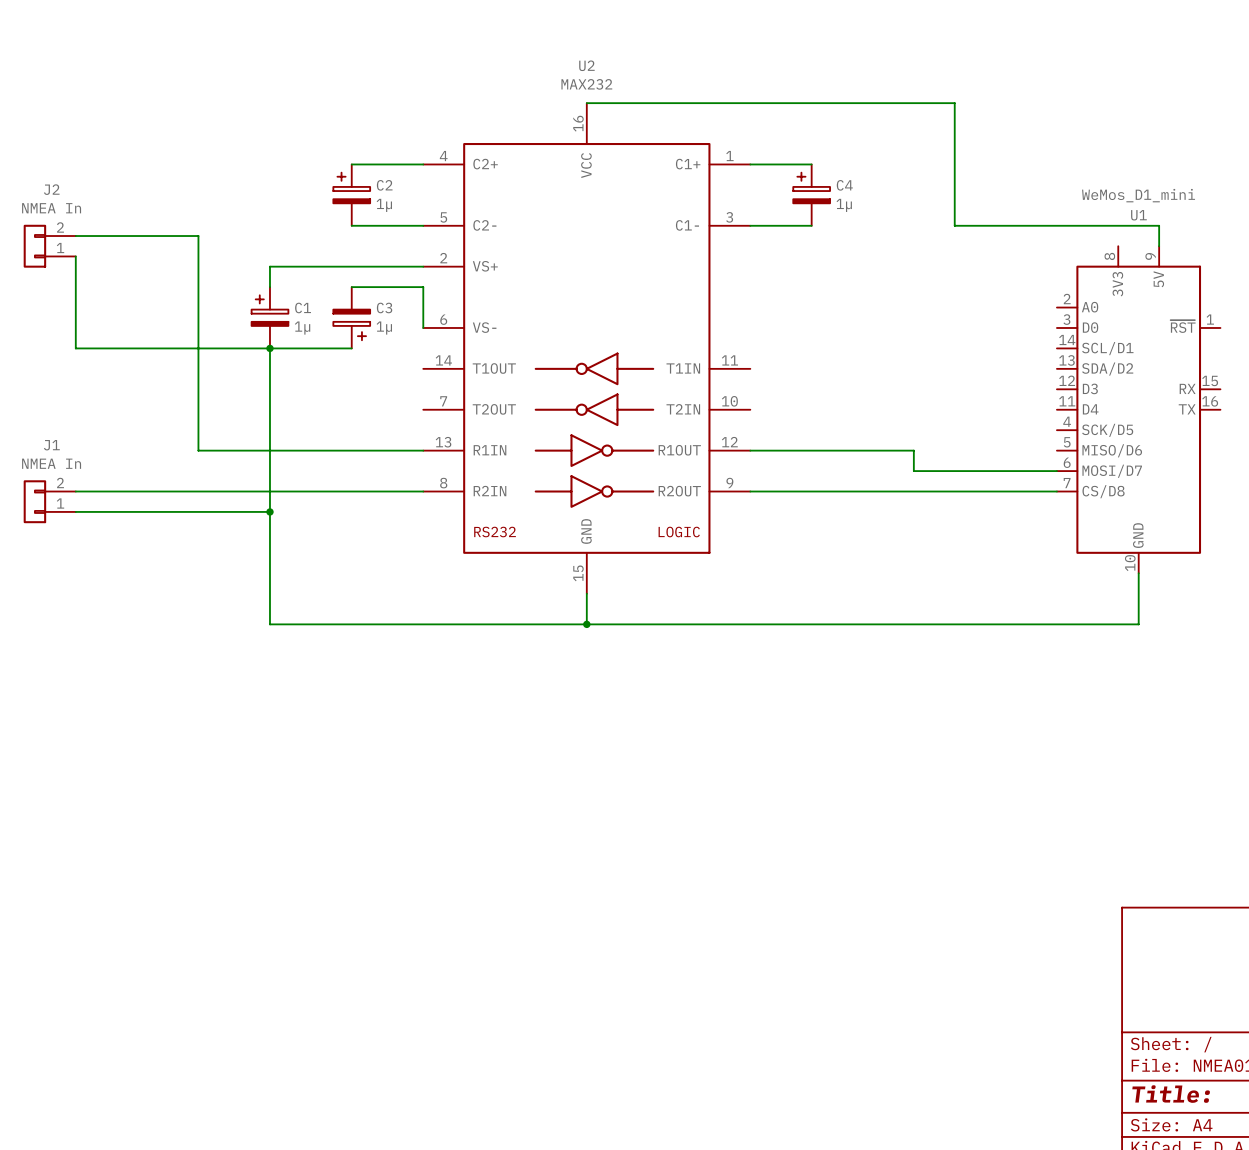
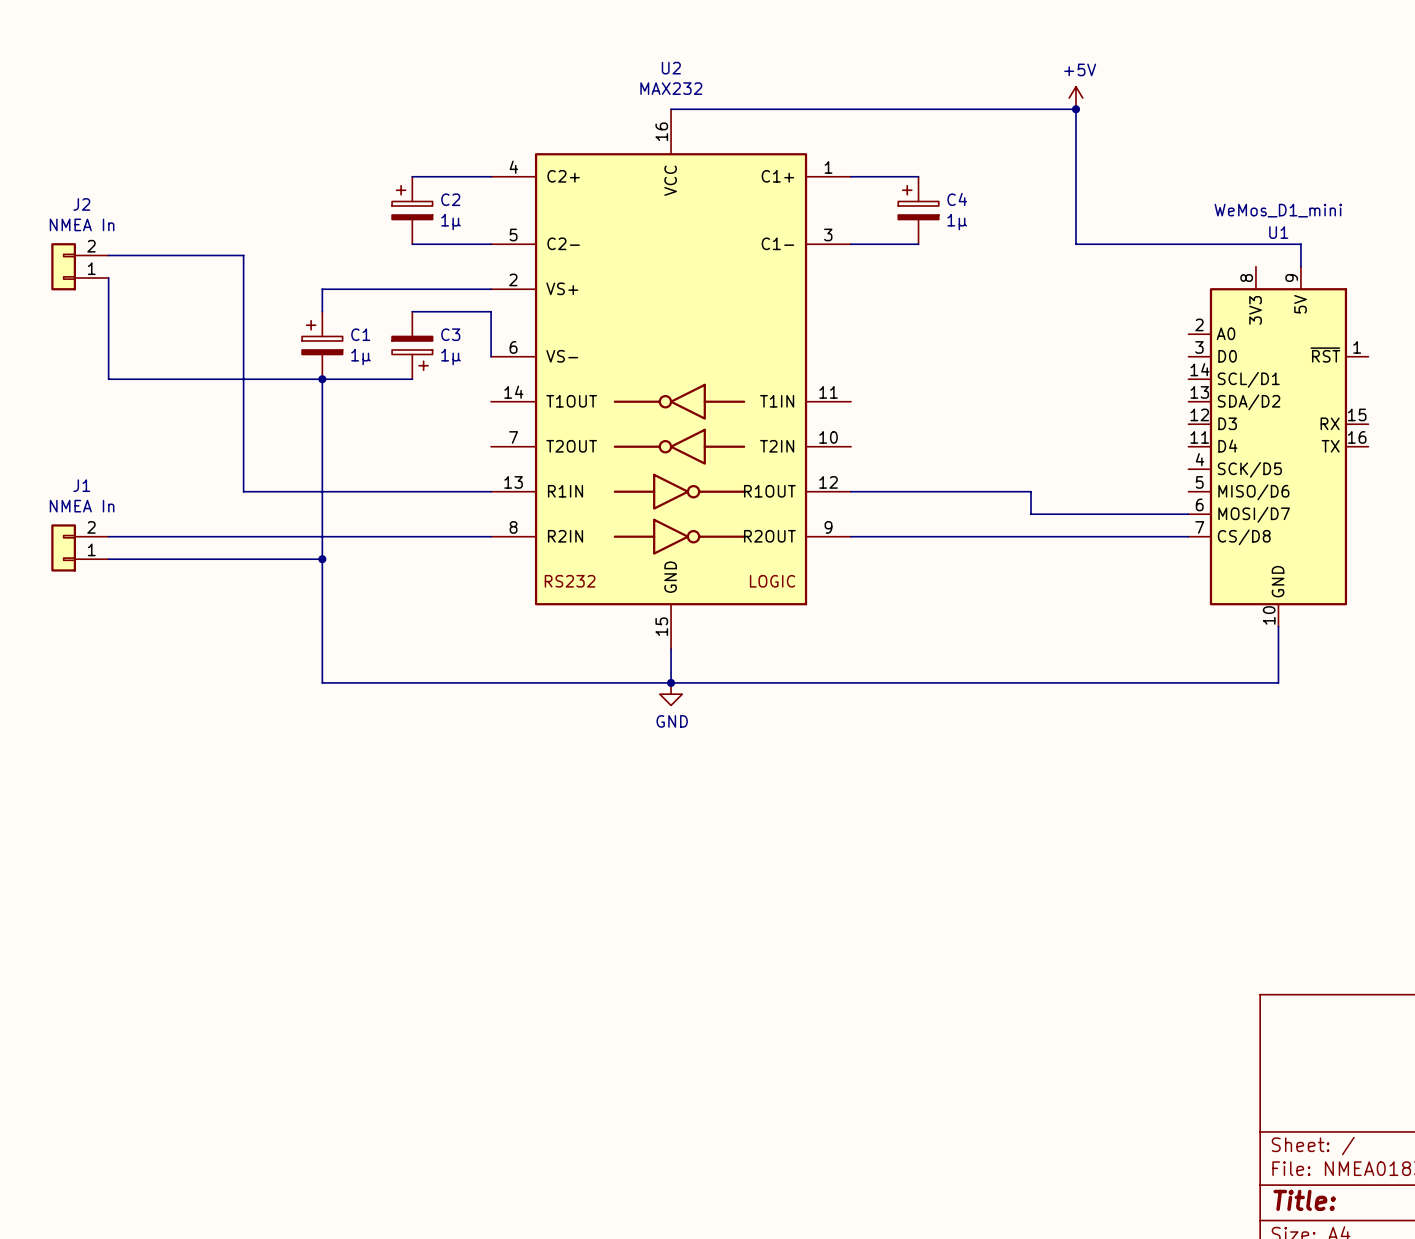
power symbol: none -> +5V (1075, 98)
junction: none -> (1075, 109)
power symbol: none -> GND (671, 694)

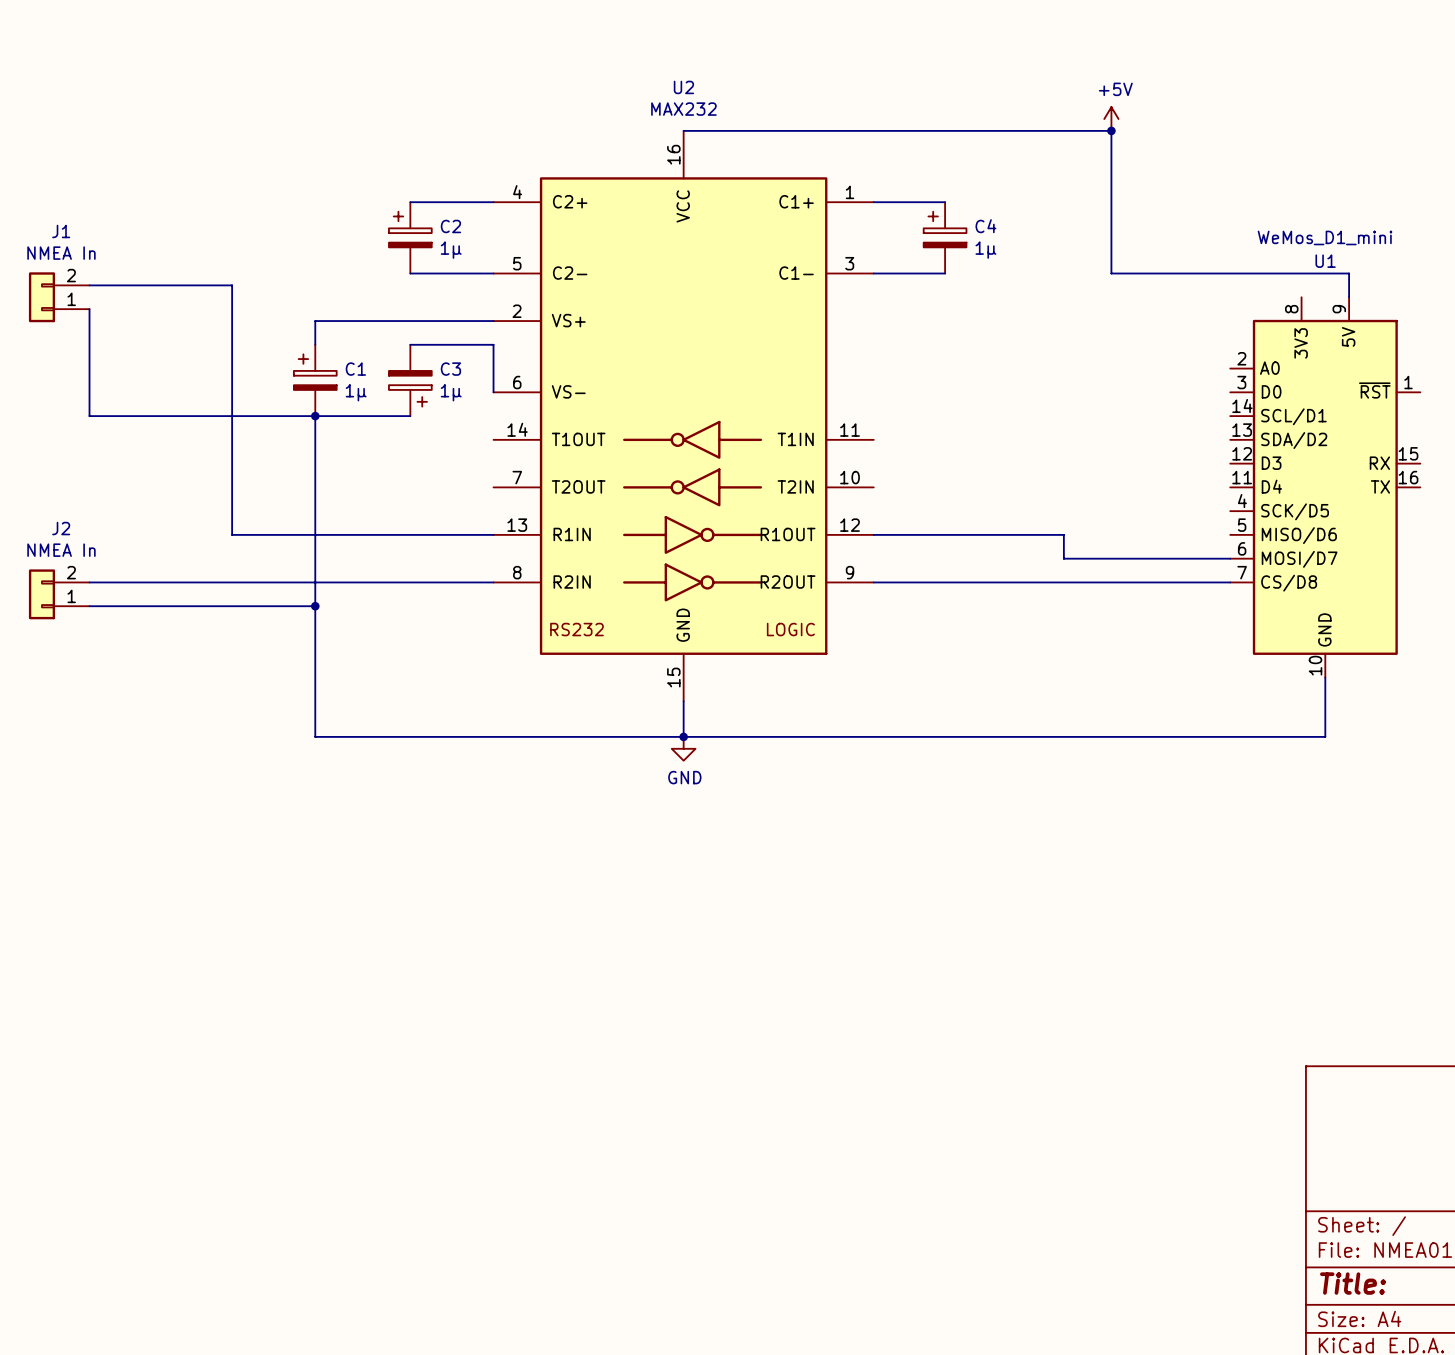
J2 name: J2 (81, 204) -> J1 (61, 231)
J1 name: J1 (81, 485) -> J2 (61, 528)

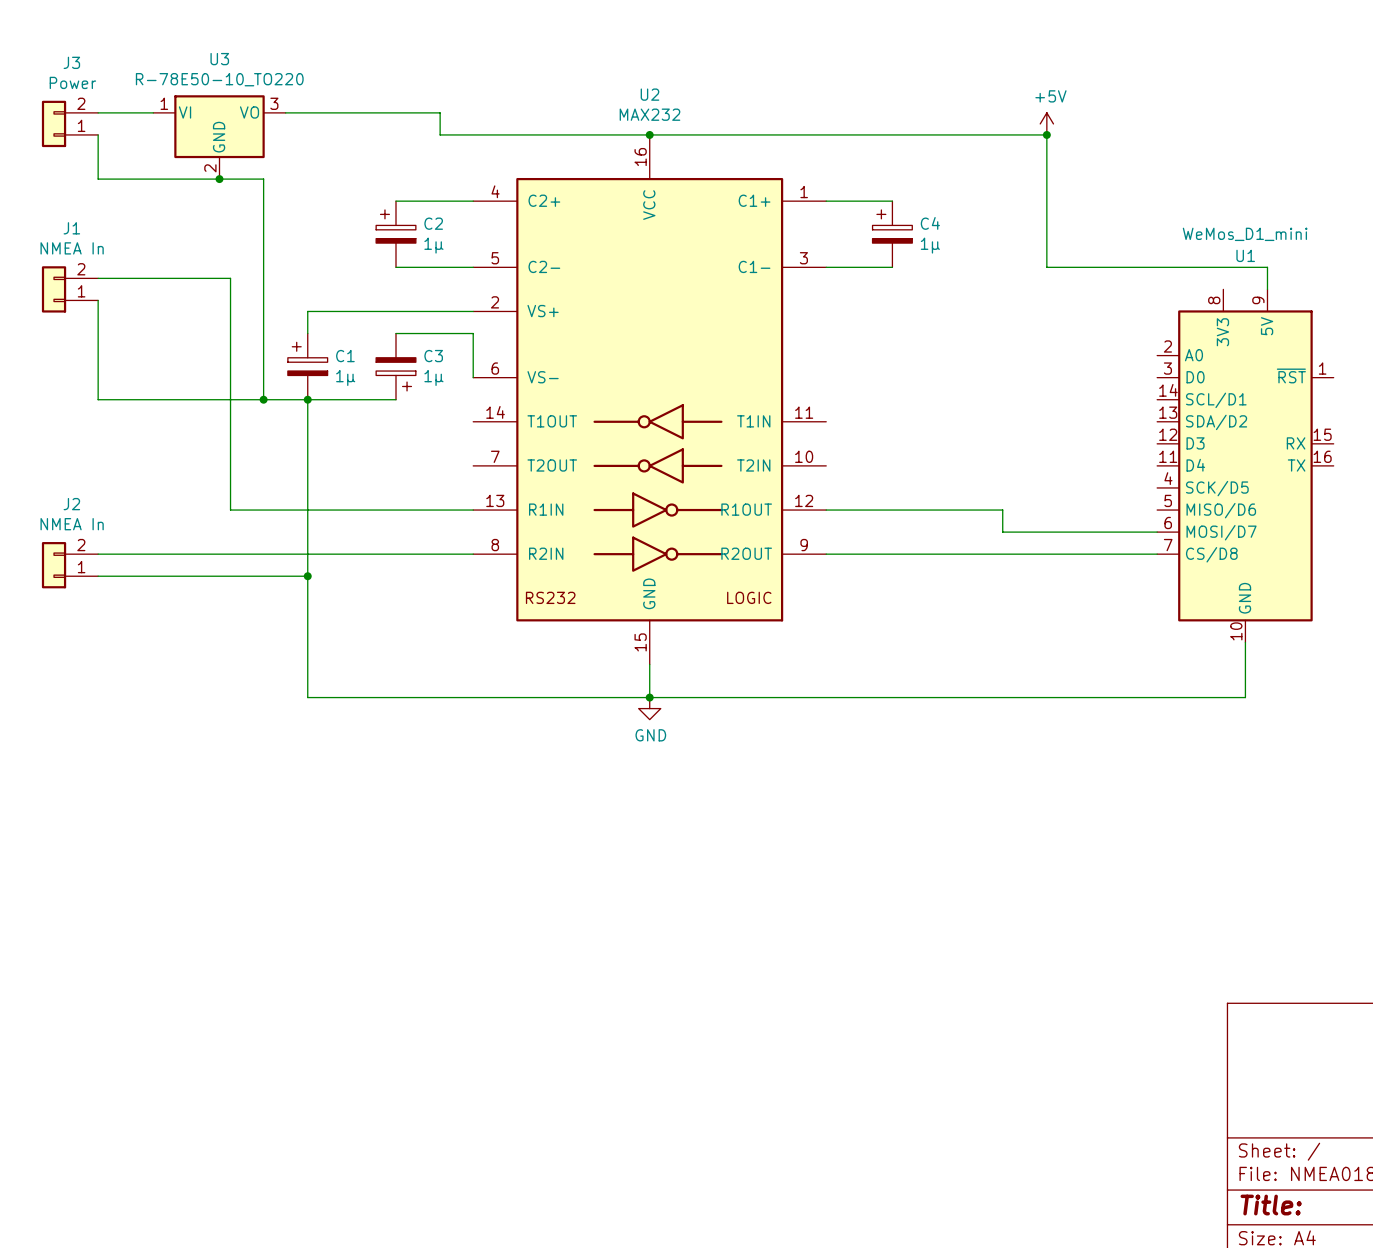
wire: none -> (98, 112) (153, 112)
wire: none -> (285, 112) (440, 112) (440, 134) (649, 134)
J3: none -> Power (70, 123)
wire: none -> (98, 134) (98, 179) (263, 179) (263, 399)
junction: none -> (649, 134)
U3: none -> R-78E50-10_TO220 (219, 137)
junction: none -> (219, 179)
junction: none -> (263, 399)

